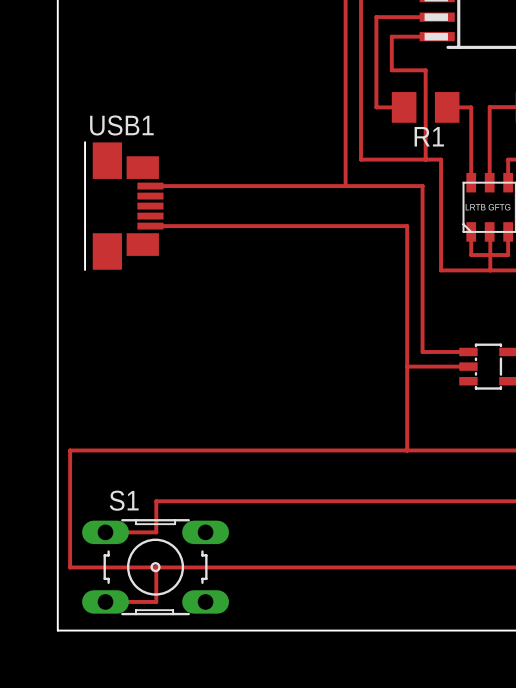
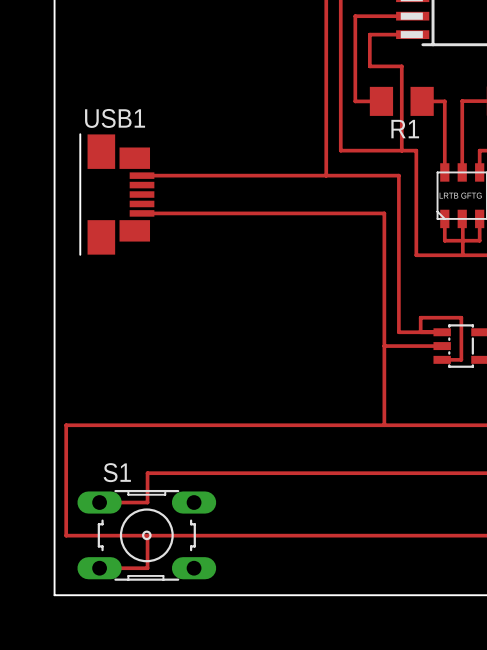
track: none -> (420, 332) (420, 317) (461, 317) (461, 359) (442, 359)

